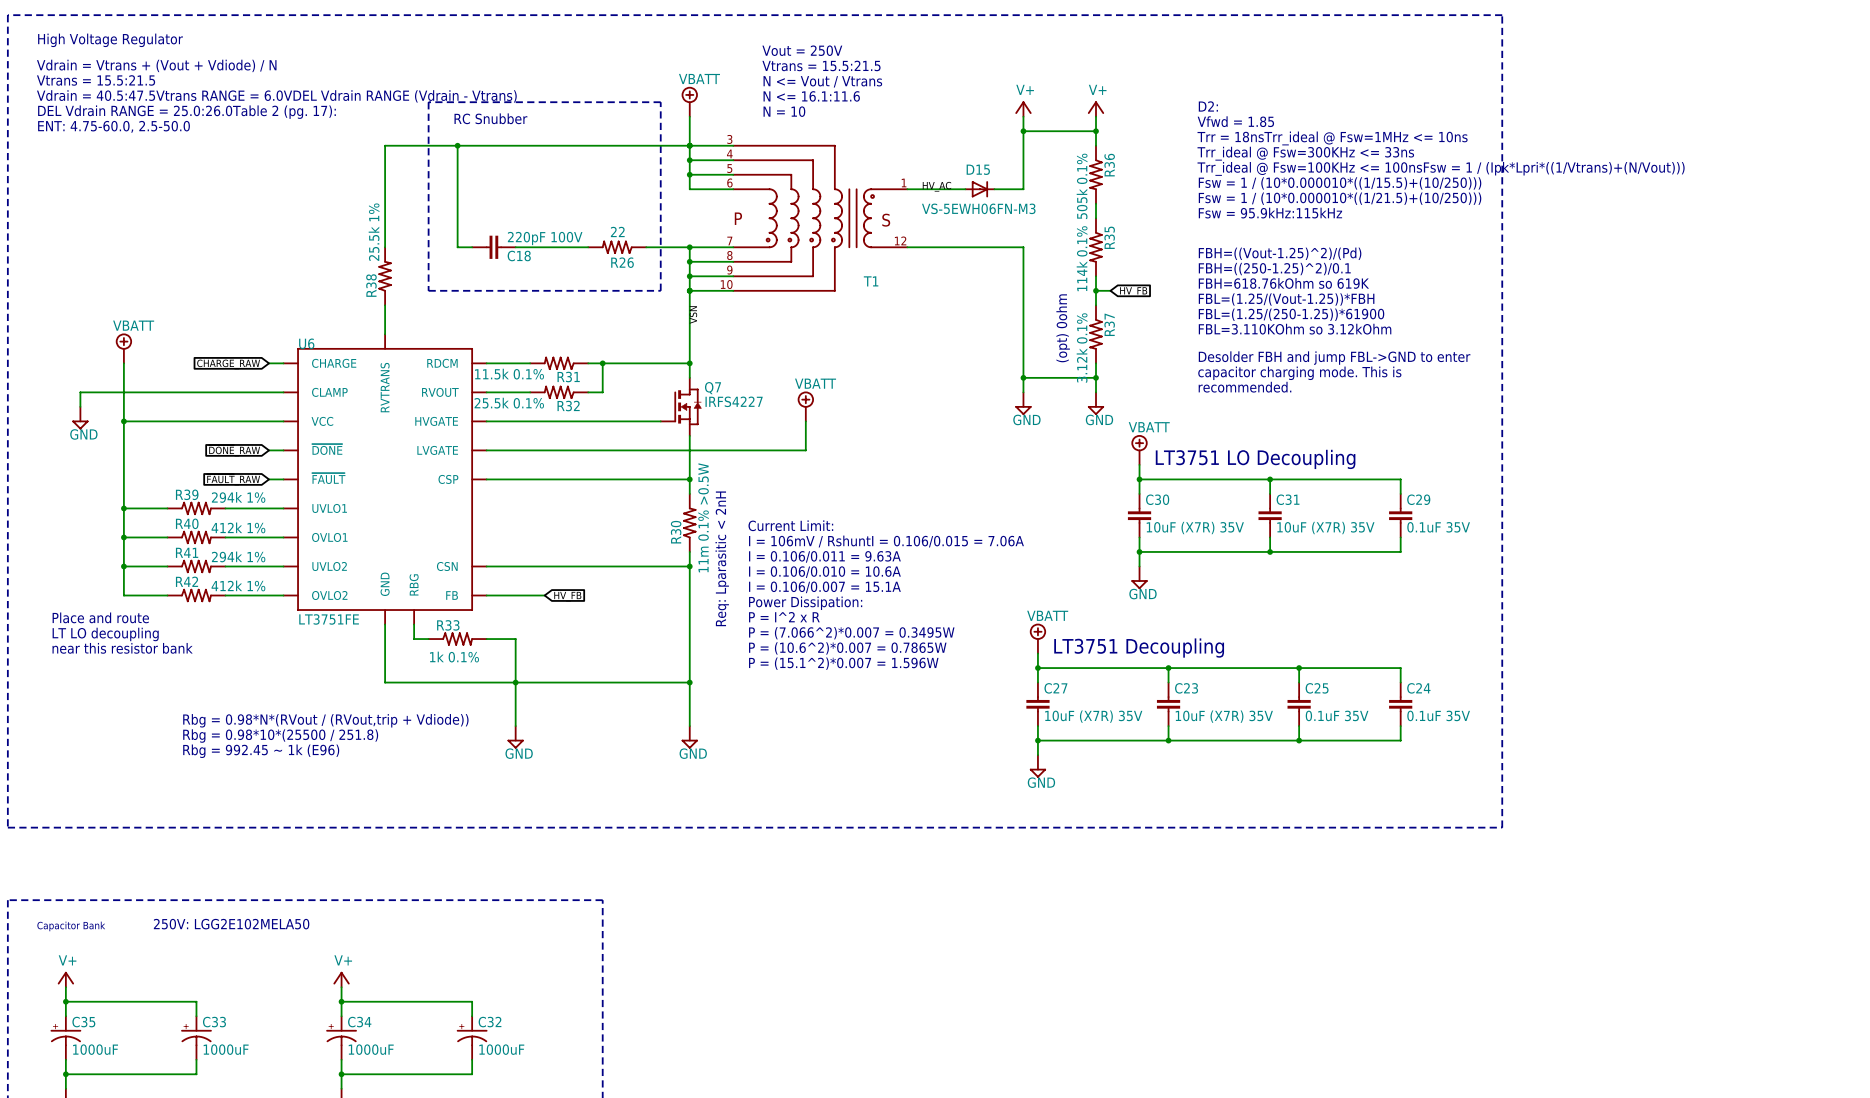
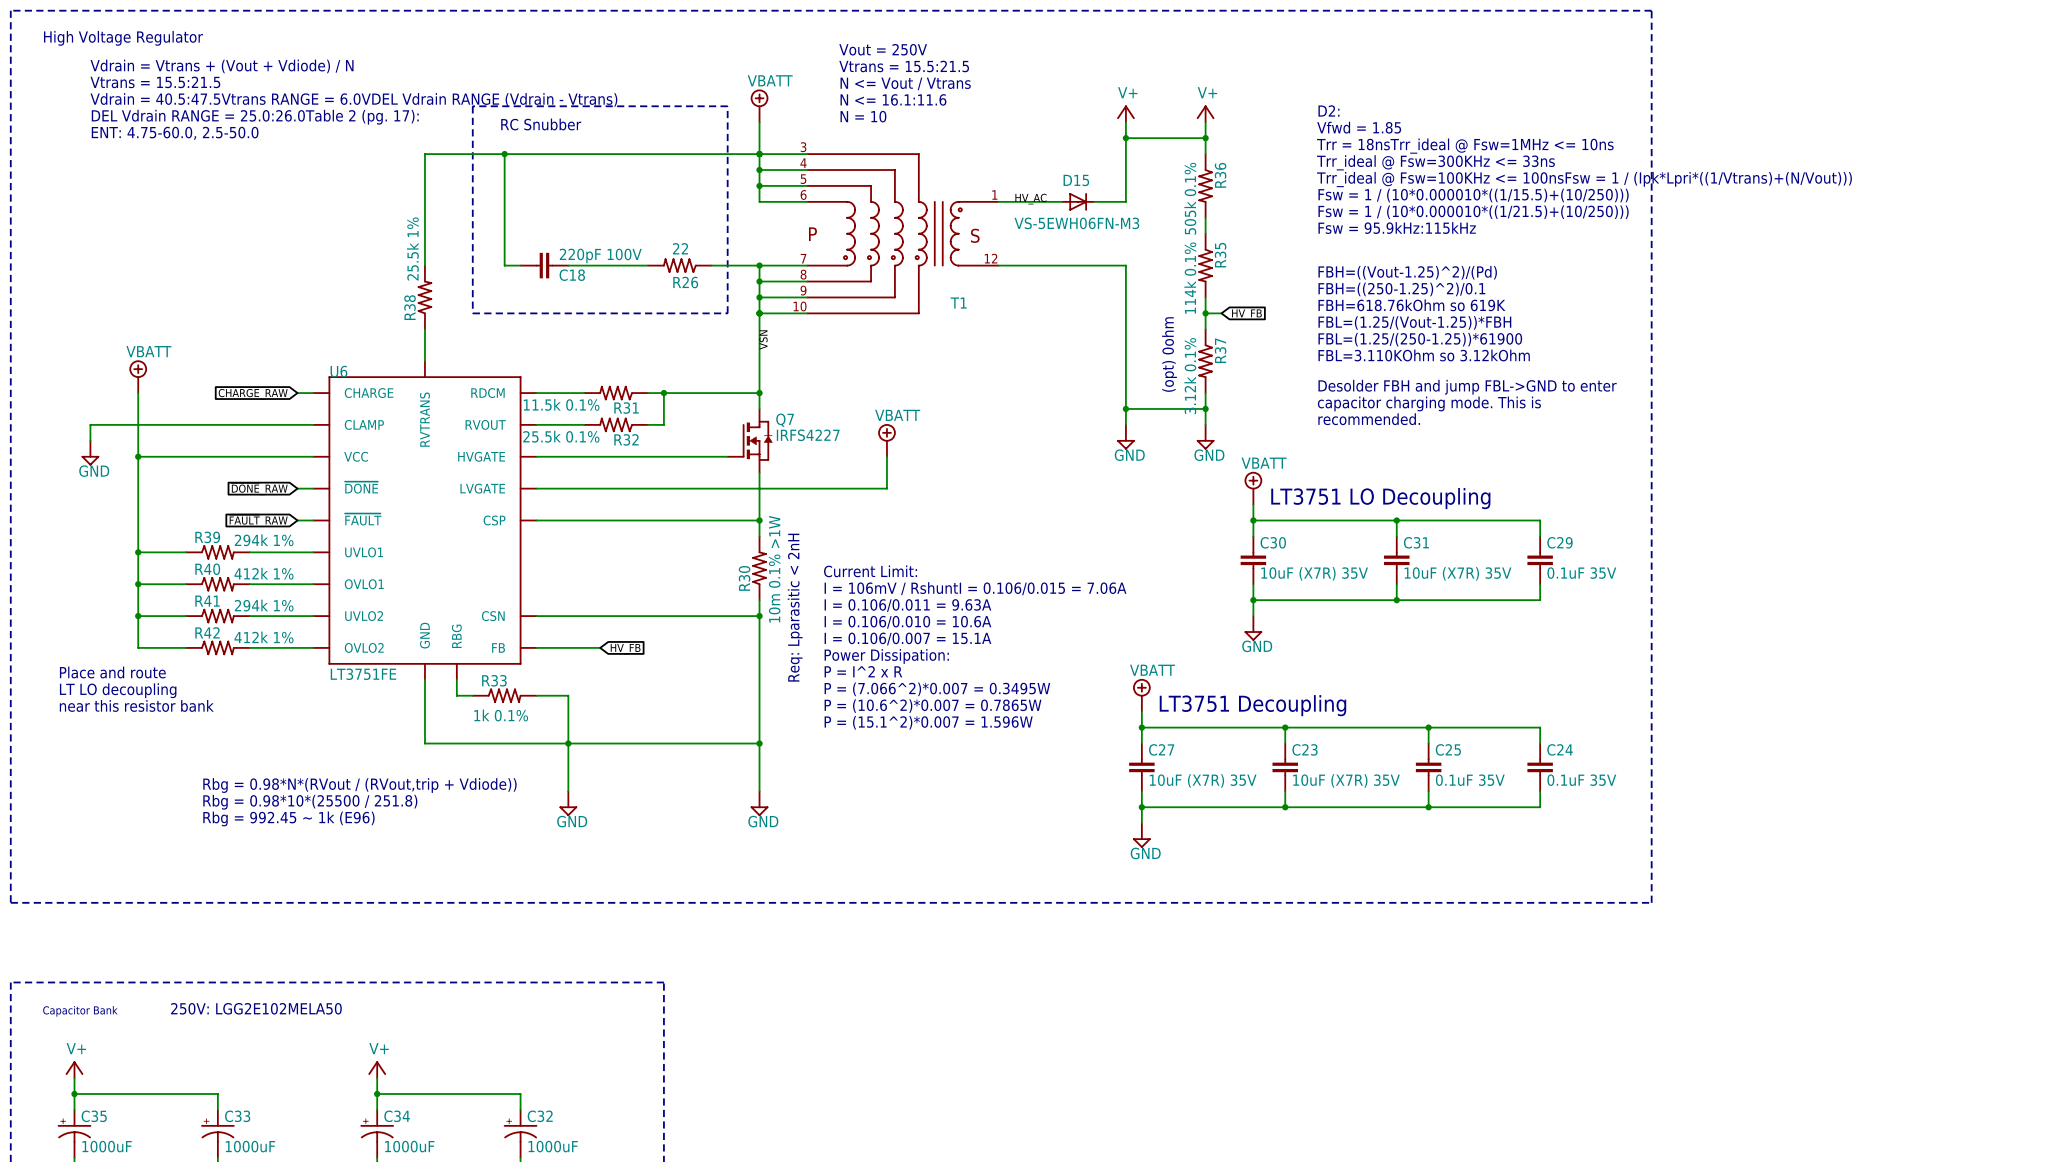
text position: Vdrain = Vtrans + (Vout + Vdiode) / N (156, 65) -> Vdrain = Vtrans + (Vout + Vdiode) / N (222, 66)
text position: Vtrans = 15.5:21.5 (96, 80) -> Vtrans = 15.5:21.5 (155, 82)
text position: Vdrain = 40.5:47.5Vtrans RANGE = 6.0VDEL Vdrain RANGE (Vdrain - Vtrans) (276, 96) -> Vdrain = 40.5:47.5Vtrans RANGE = 6.0VDEL Vdrain RANGE (Vdrain - Vtrans) (353, 99)
text position: DEL Vdrain RANGE = 25.0:26.0Table 2 (pg. 17): (186, 112) -> DEL Vdrain RANGE = 25.0:26.0Table 2 (pg. 17): (255, 117)
text position: ENT: 4.75-60.0, 2.5-50.0 (114, 126) -> ENT: 4.75-60.0, 2.5-50.0 (175, 133)
R30 value: 11m 0.1% >0.5W (703, 517) -> 10m 0.1% >1W (774, 569)

